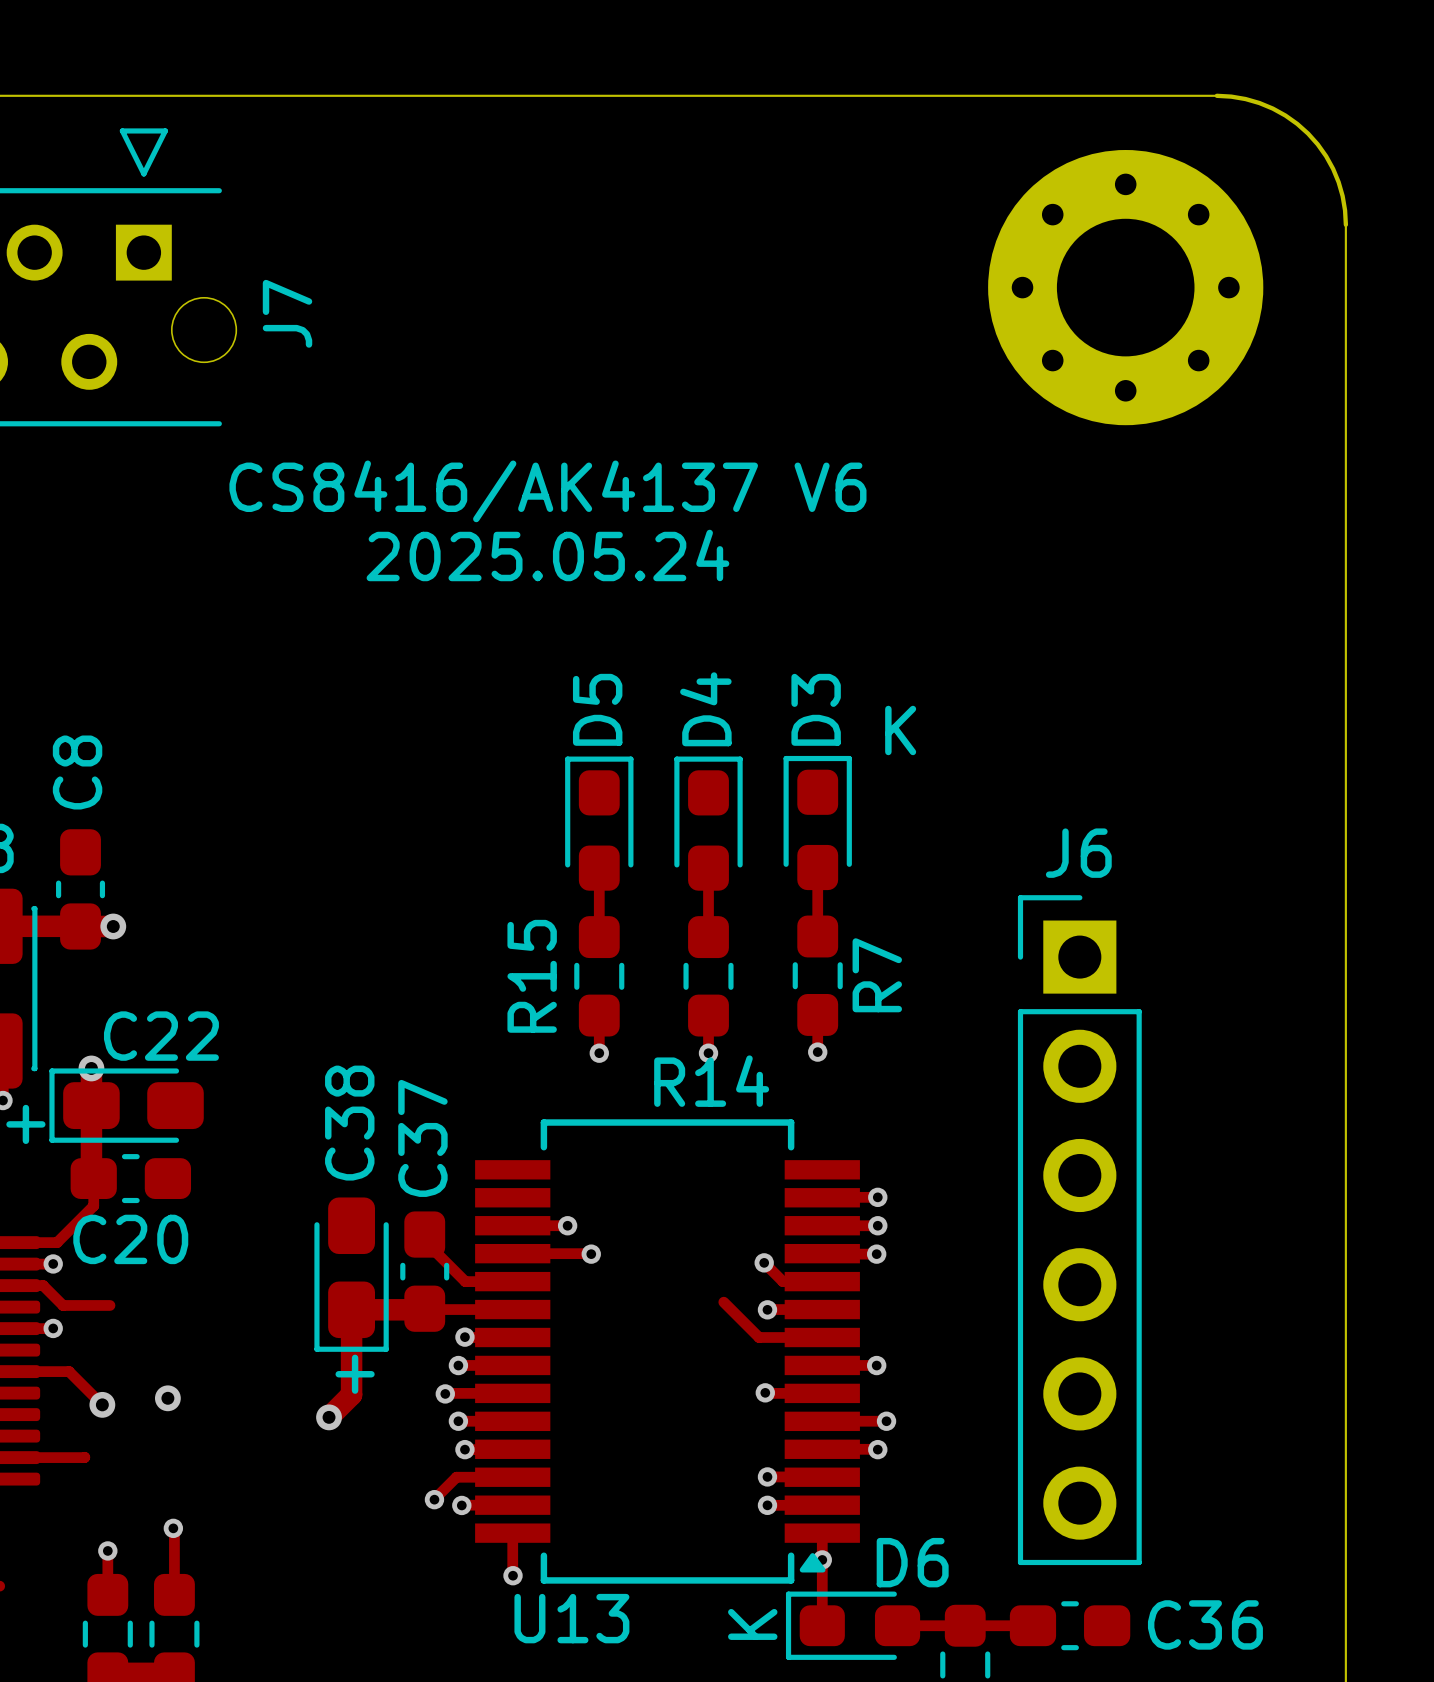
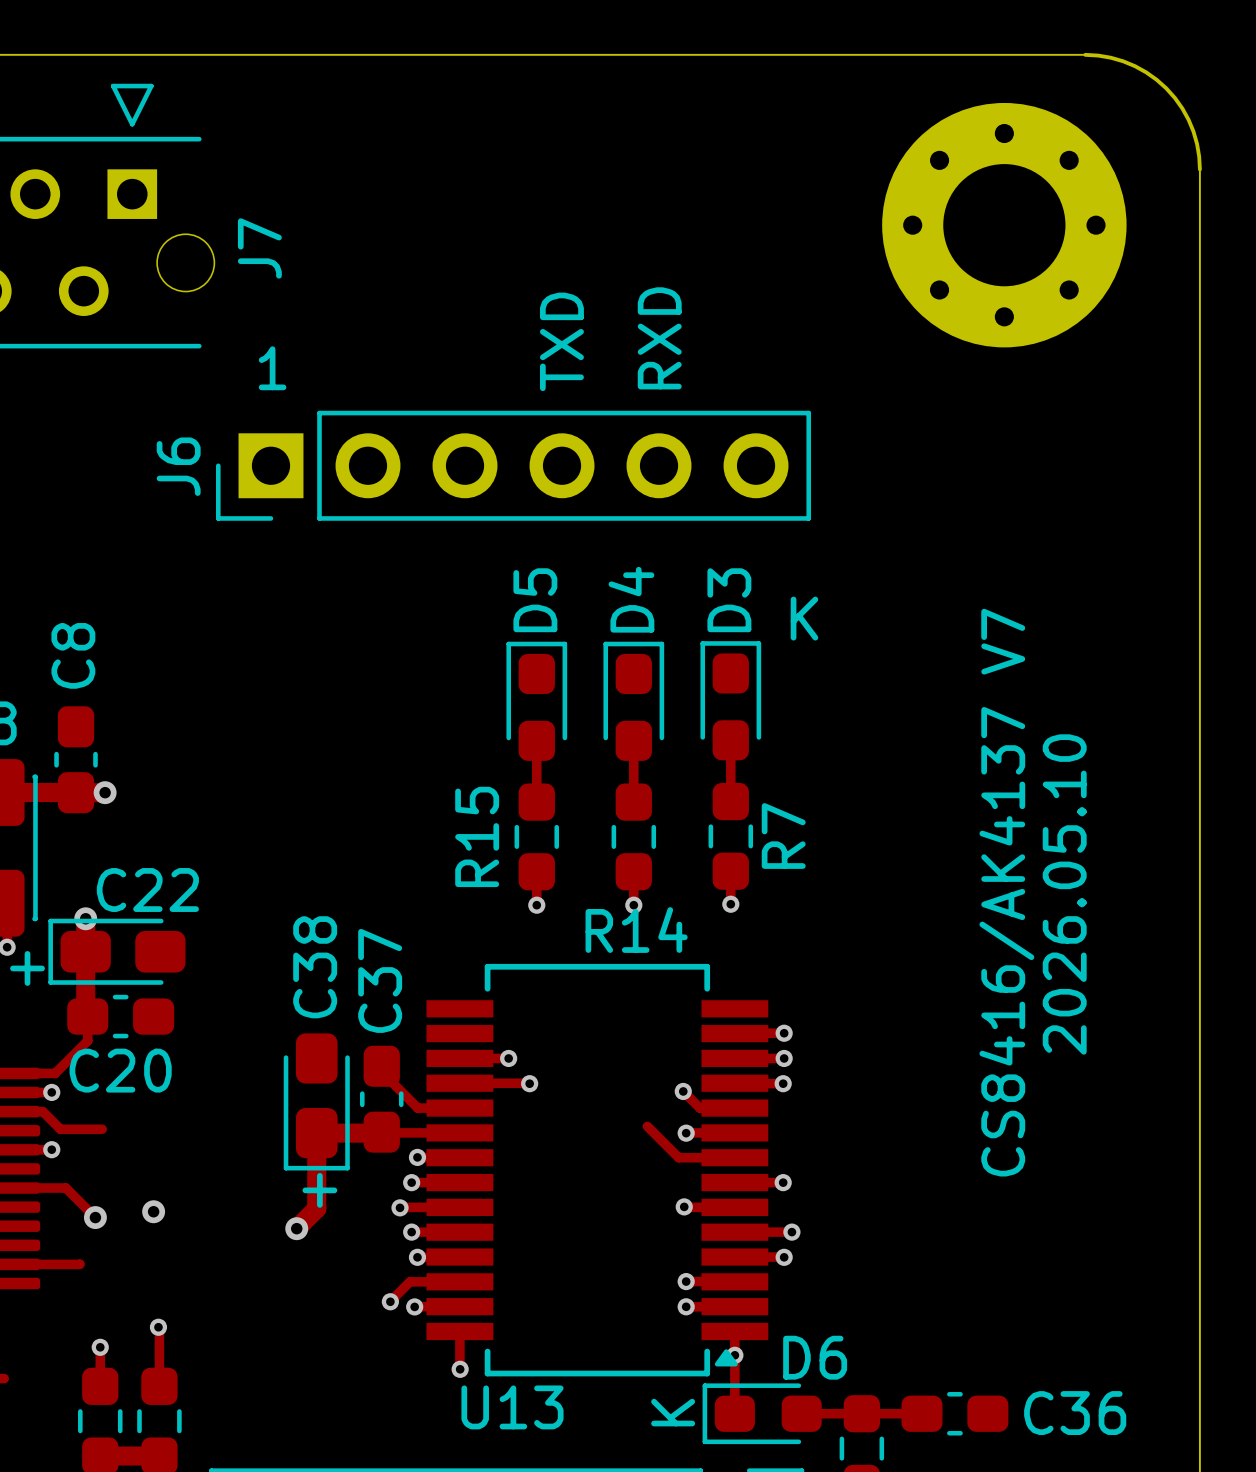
text: none -> RXD (659, 338)
text: none -> TXD (561, 341)
text: none -> 1 (272, 368)
text: CS8416/AK4137 V6 (547, 491) -> none
text: 2025.05.24 (547, 555) -> none
text: none -> CS8416/AK4137 V7 (1006, 892)
text: none -> 2026.05.10 (1064, 894)
J6 rotation: 0° (1079, 1230) -> 90° counterclockwise (513, 465)
J6 position: (1079, 1230) -> (513, 465)

